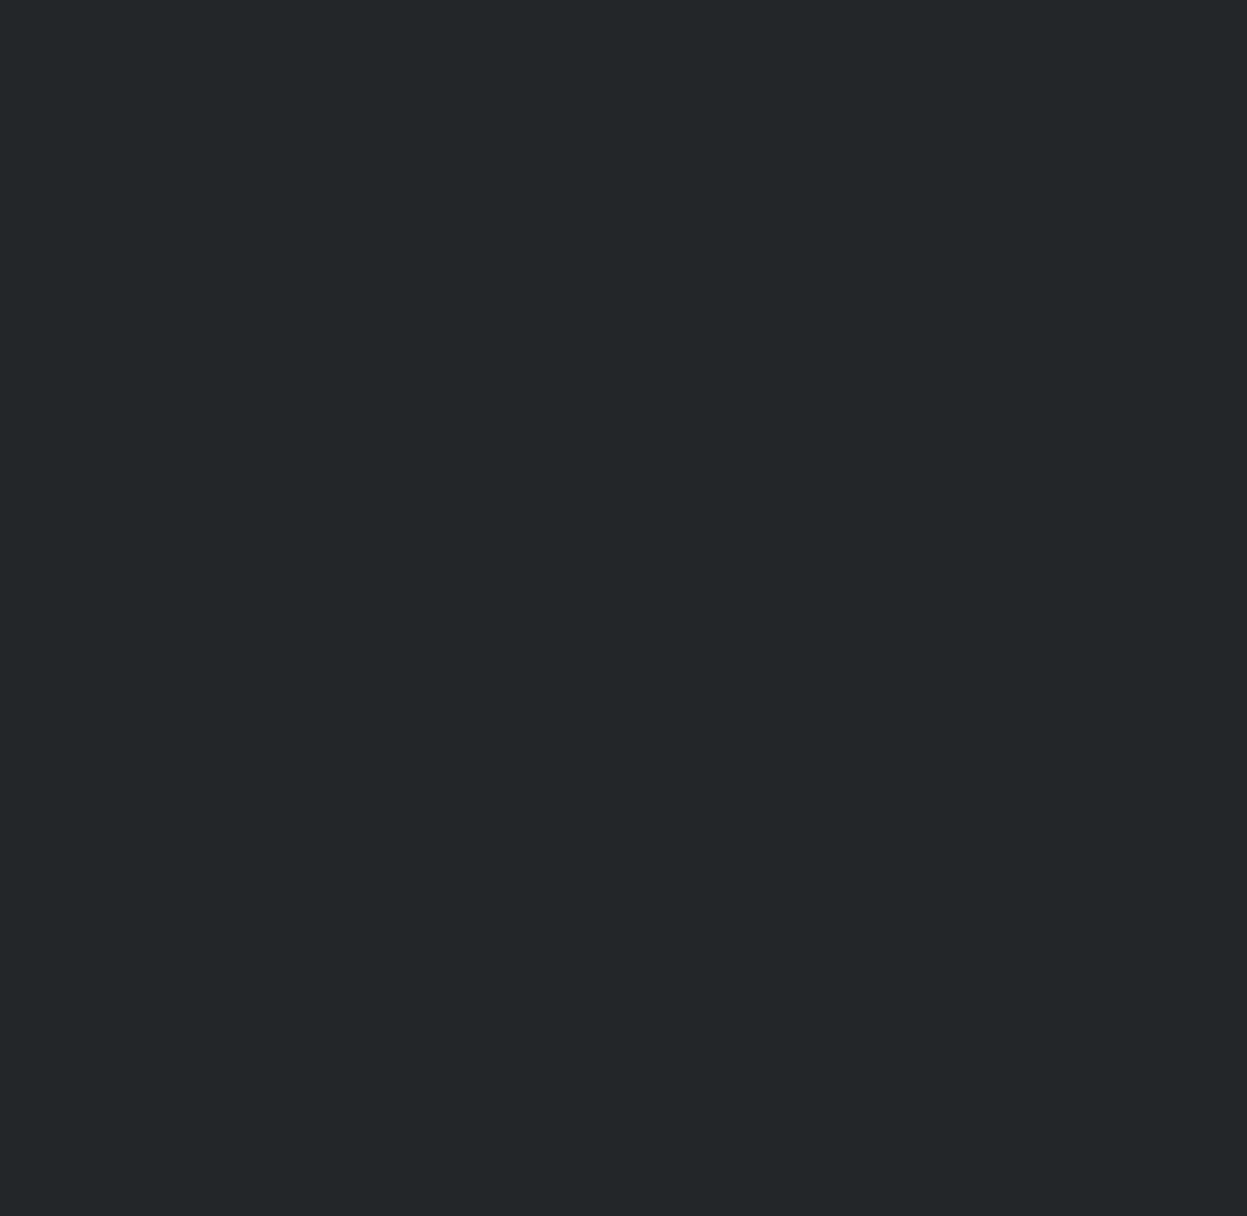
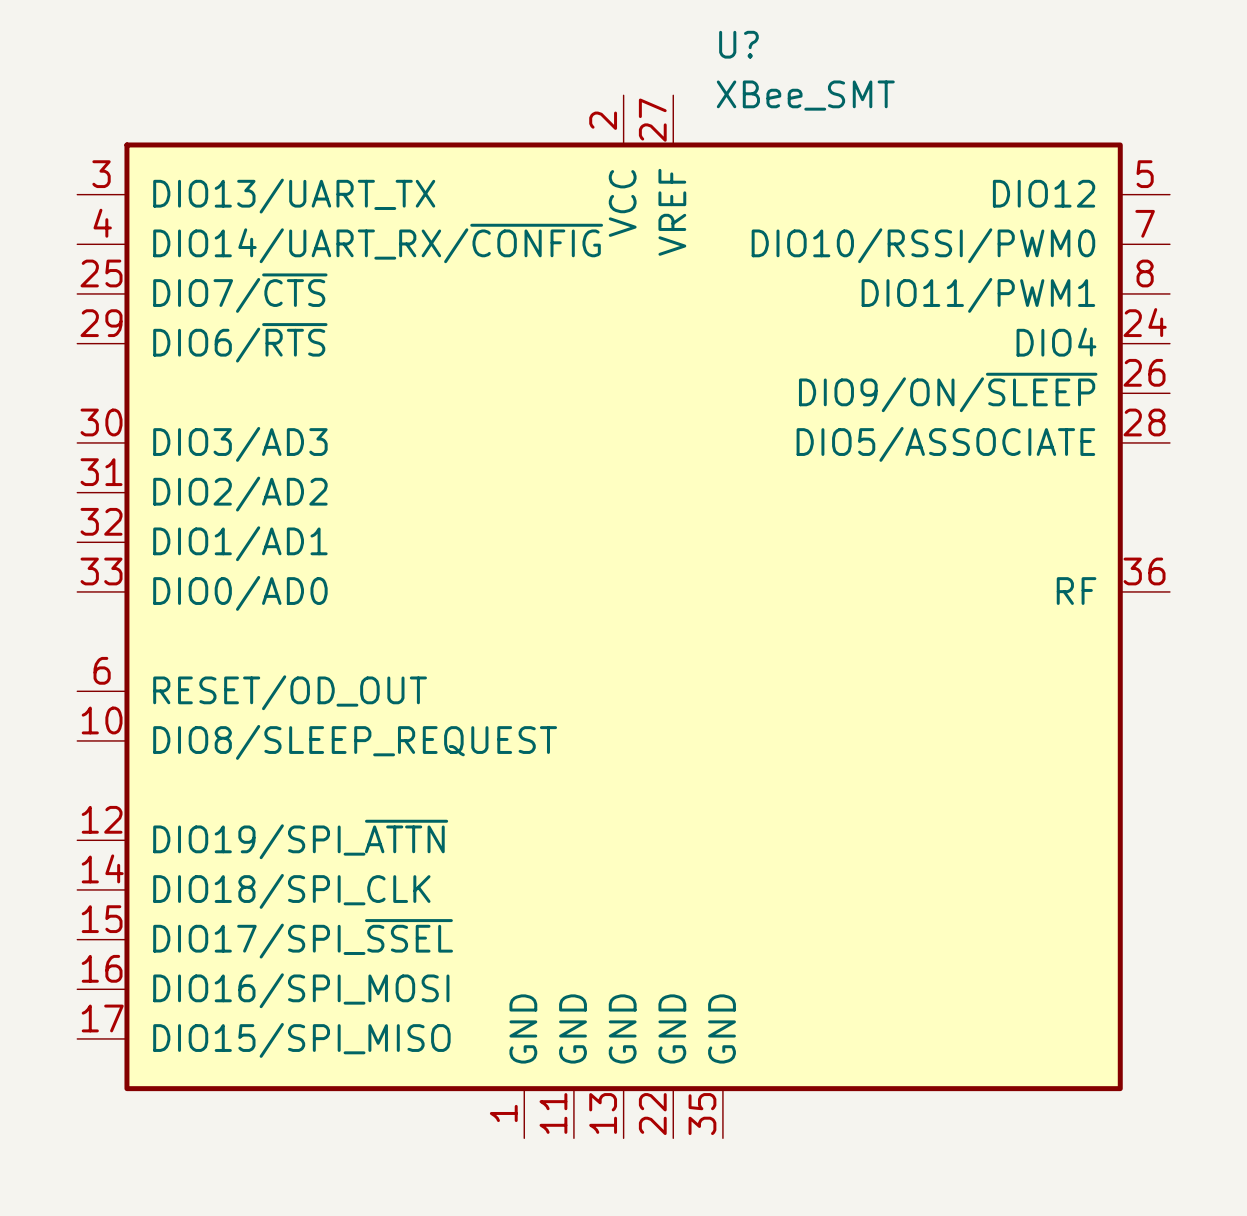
U?: none -> XBee_SMT (623, 616)

